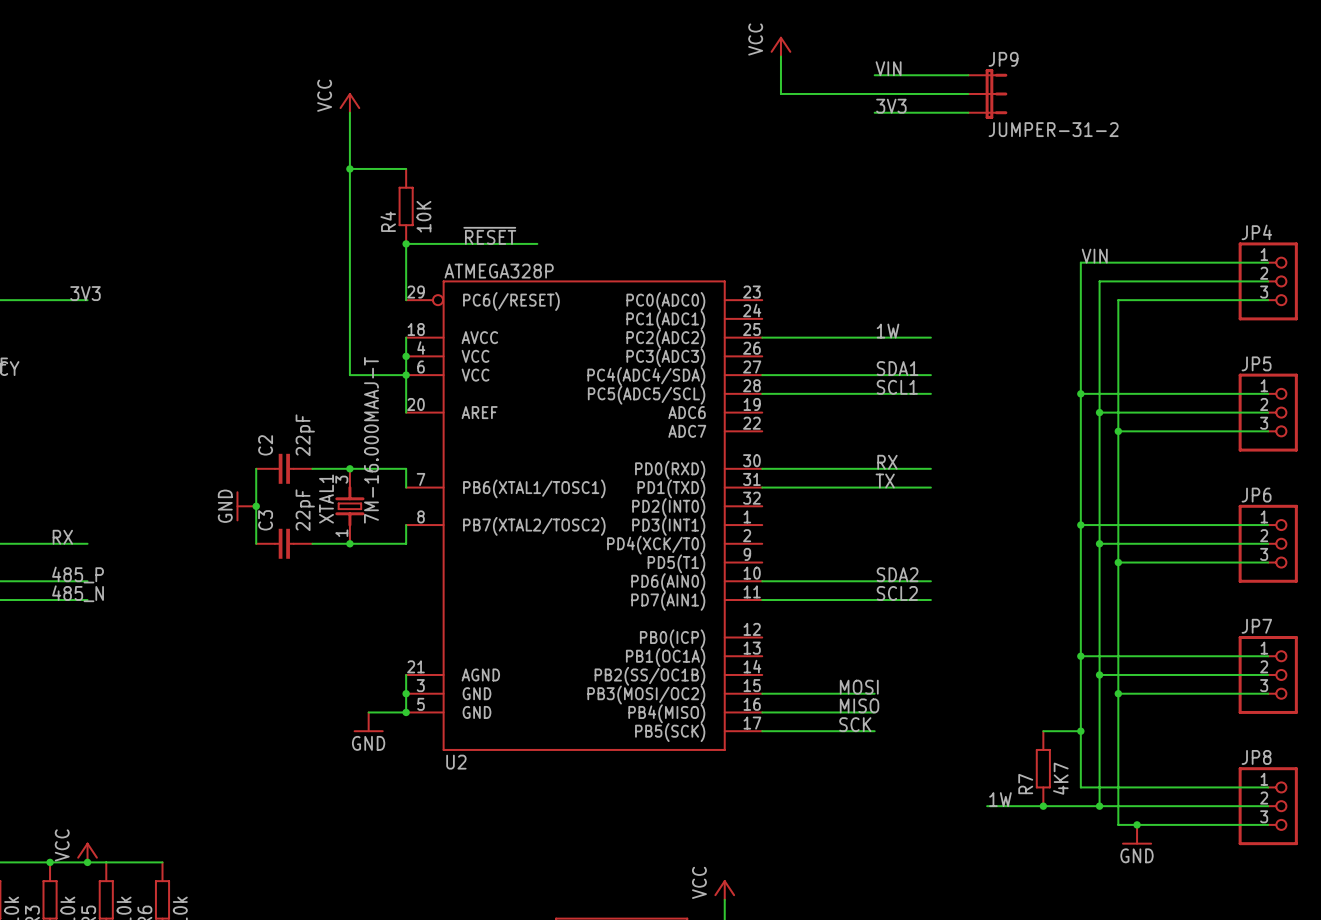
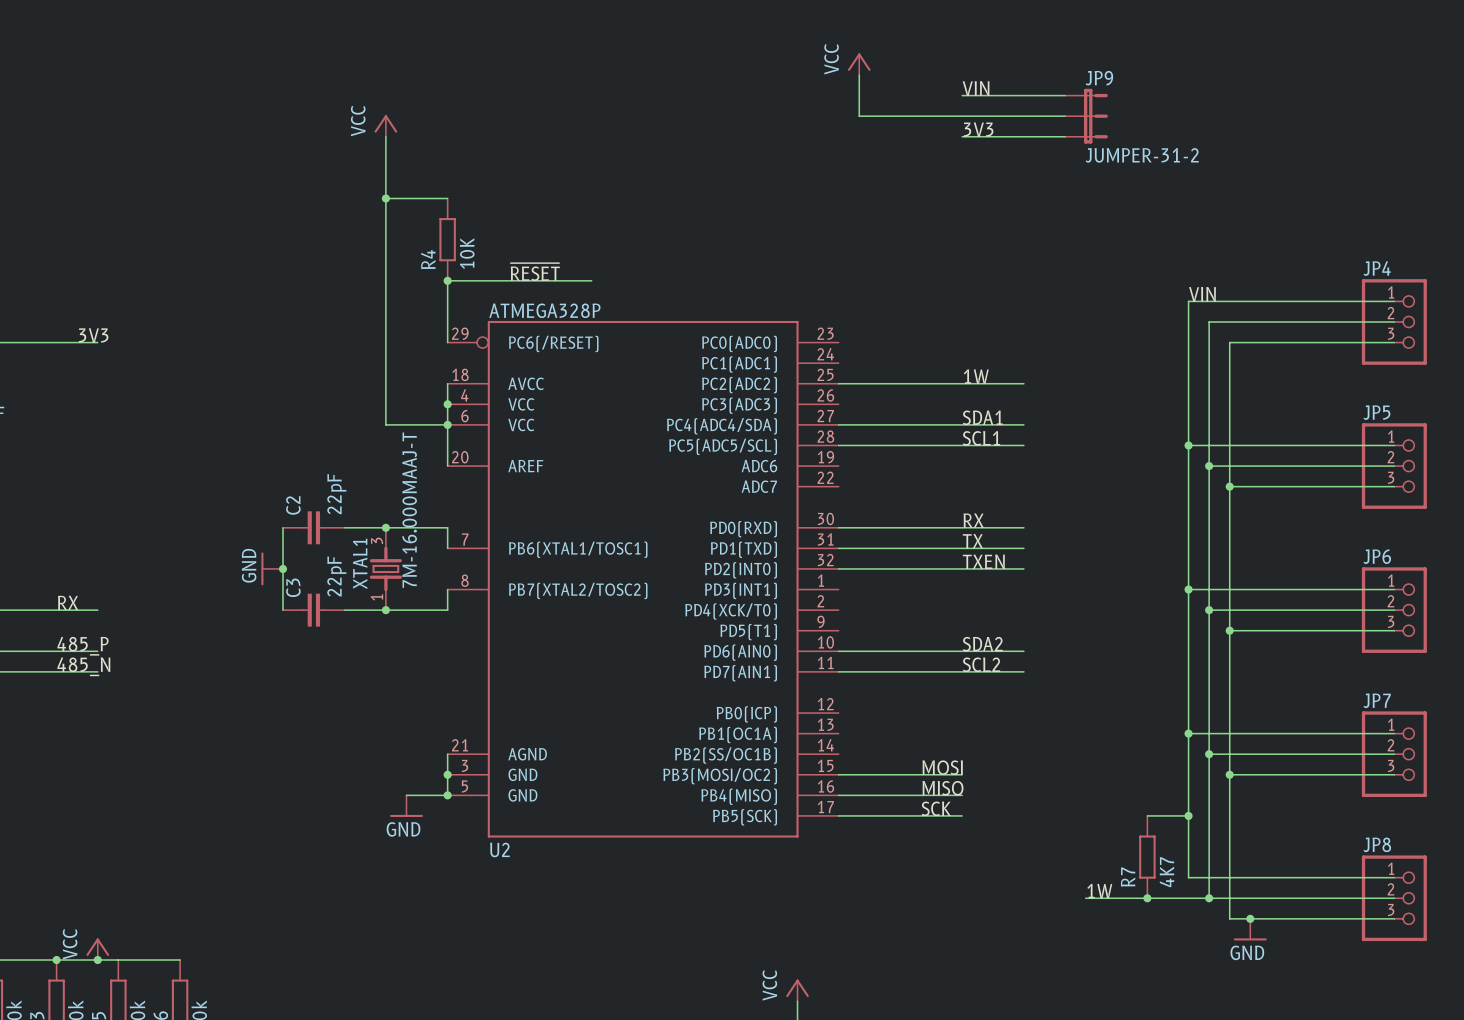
label: none -> TXEN (983, 561)
wire: none -> (838, 568) (1023, 568)

